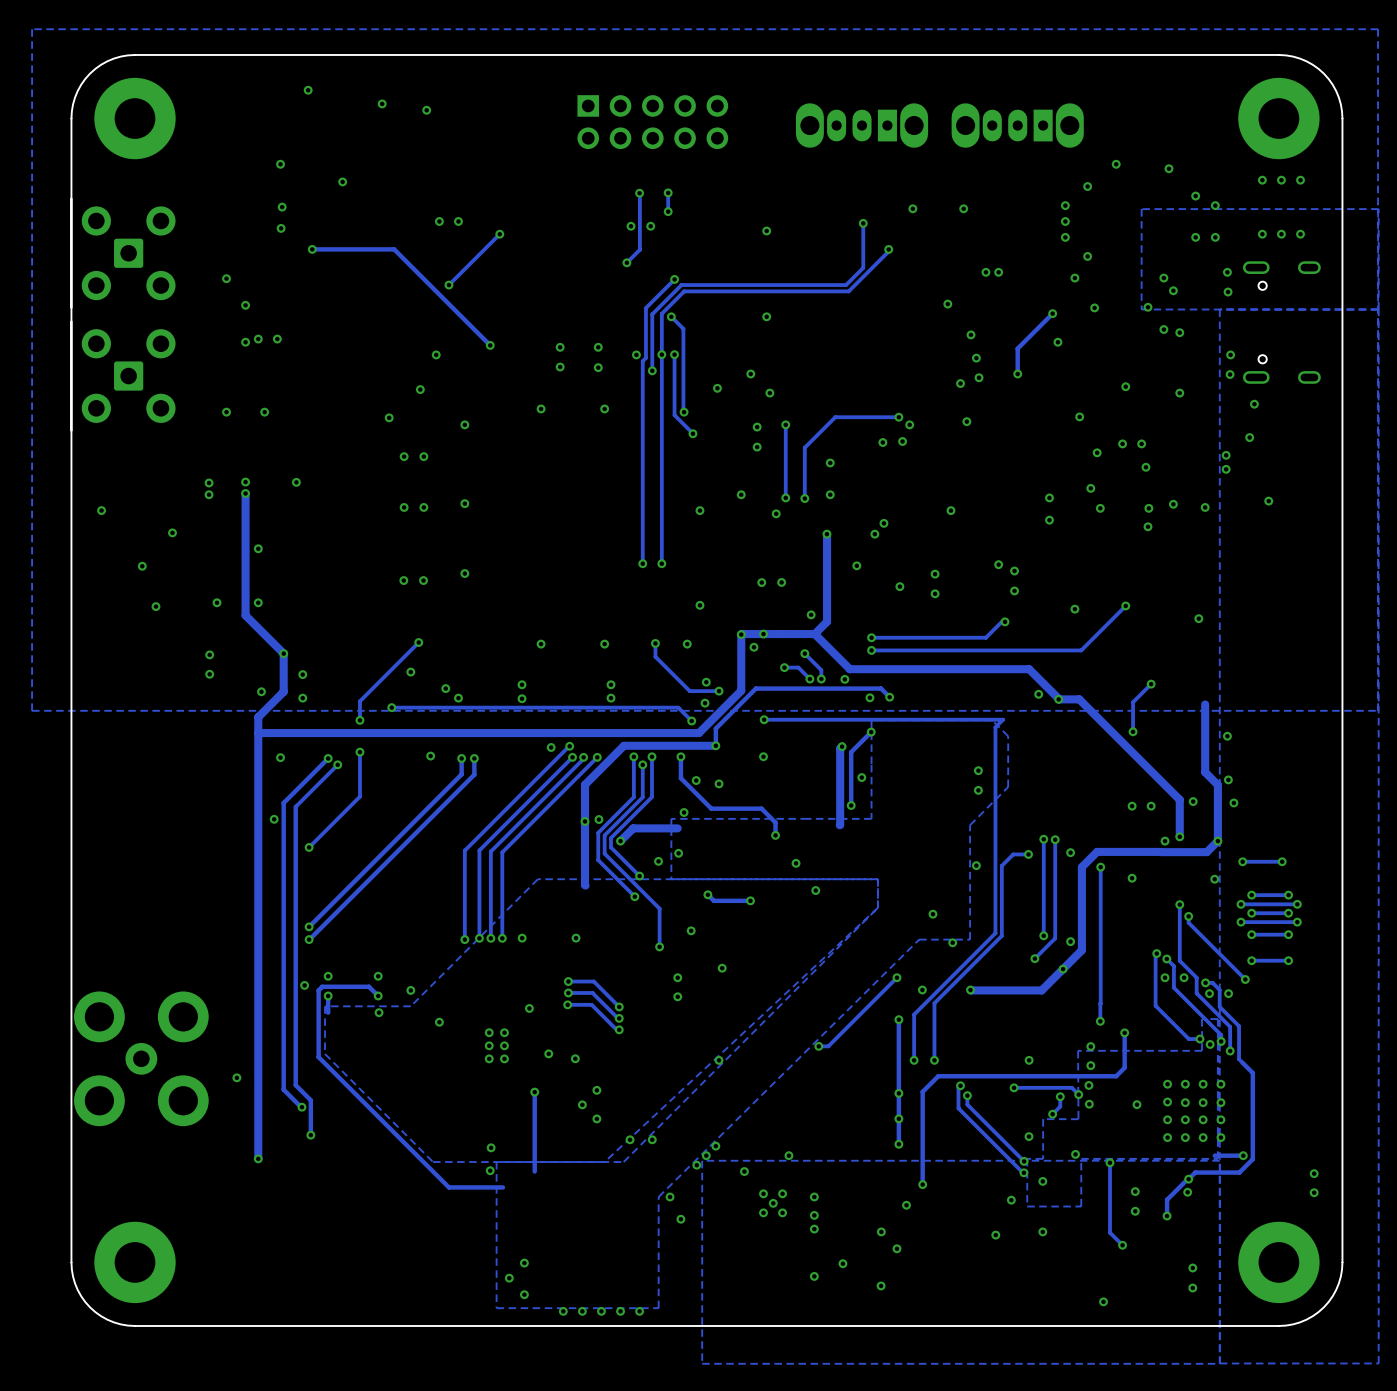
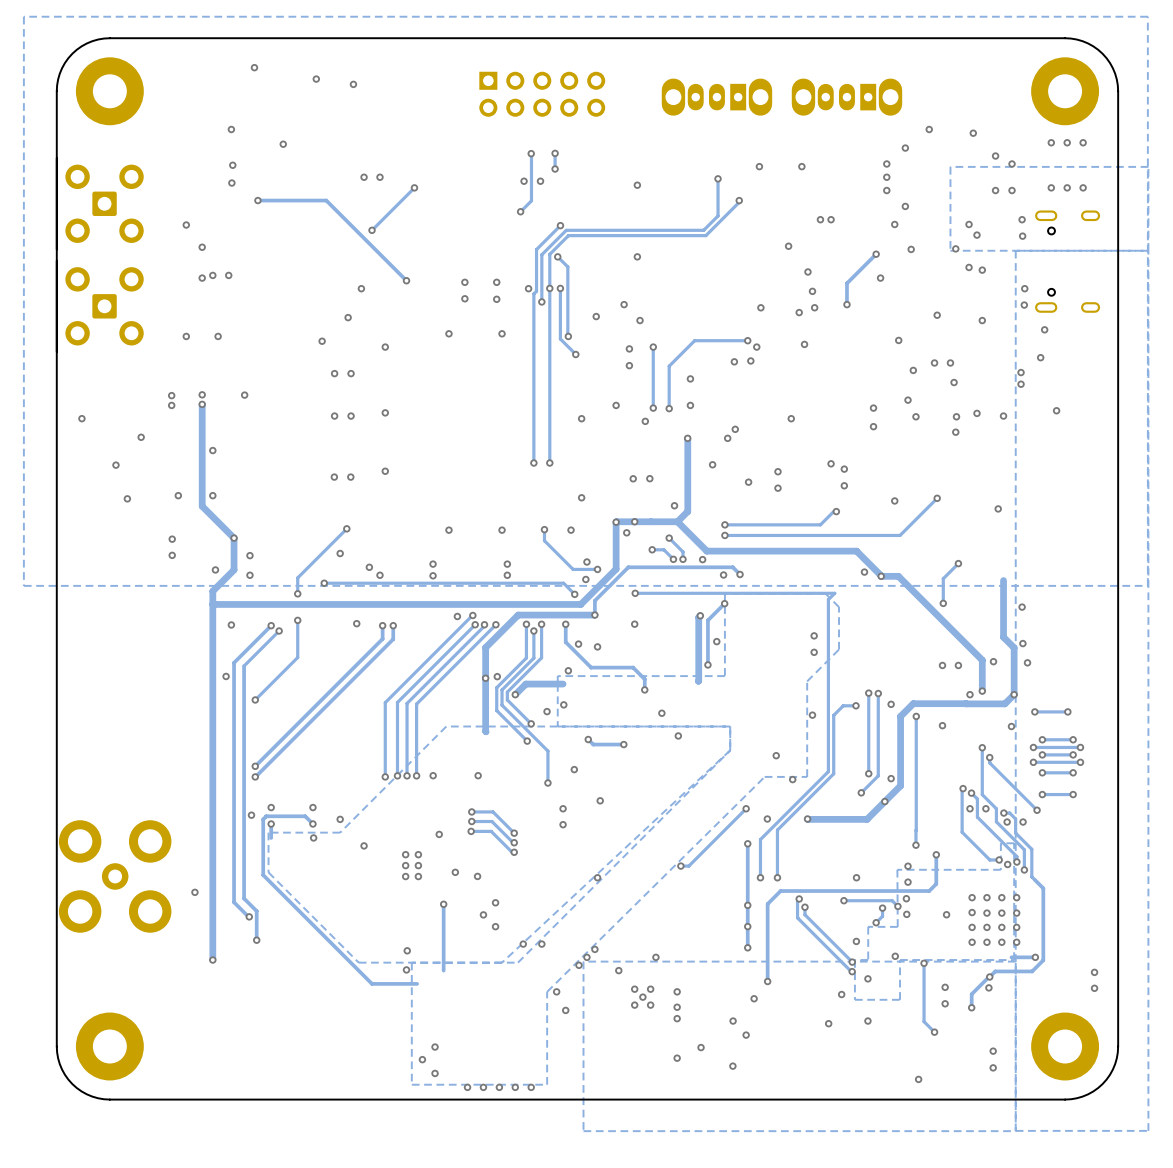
via: none -> (760, 307)

